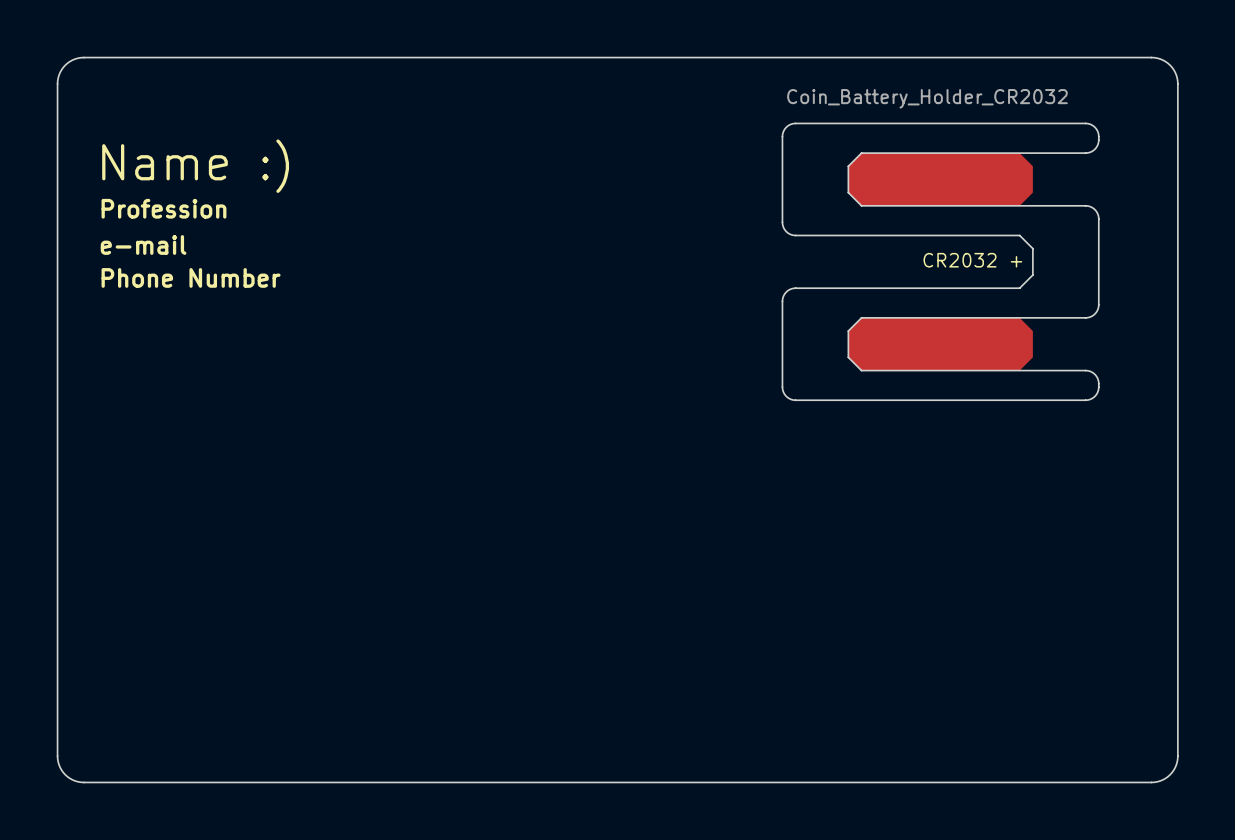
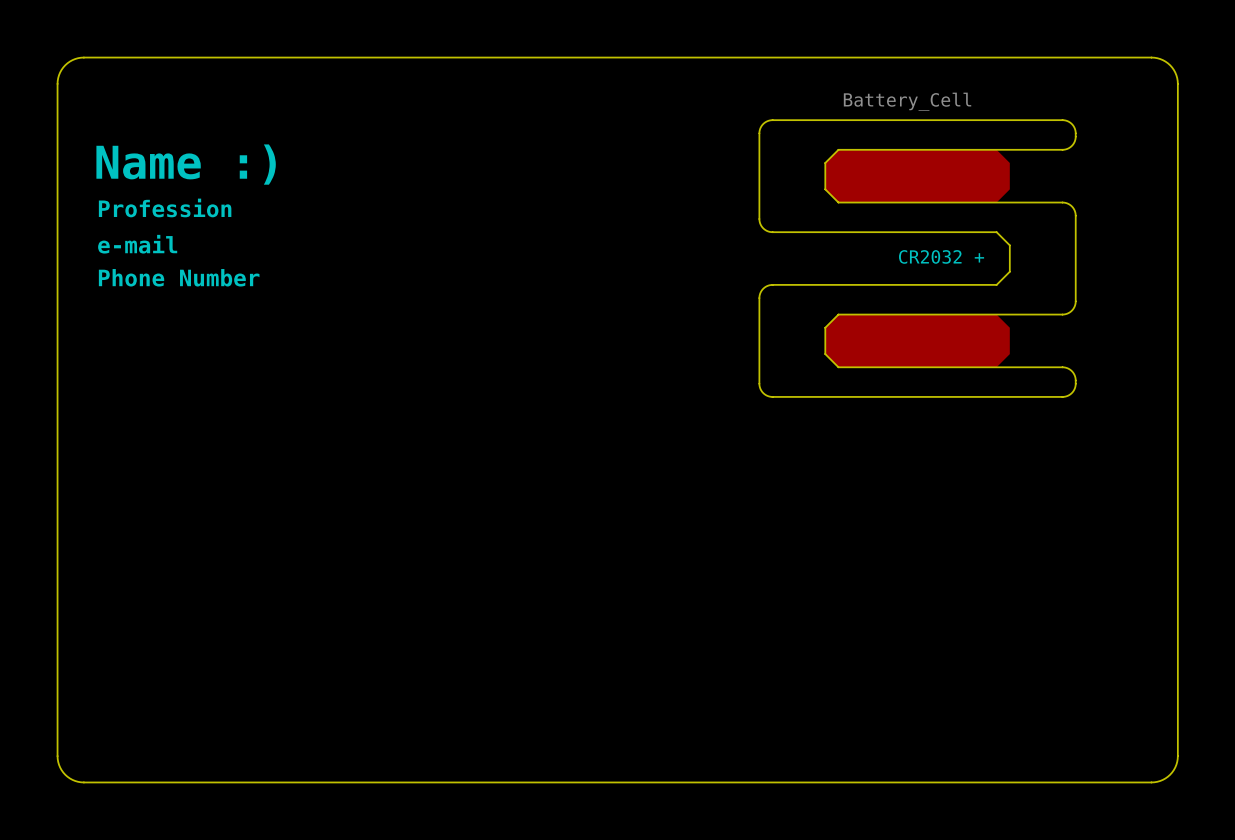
part: none -> Battery_Cell (917, 258)
part: Coin_Battery_Holder_CR2032 (940, 261) -> none

